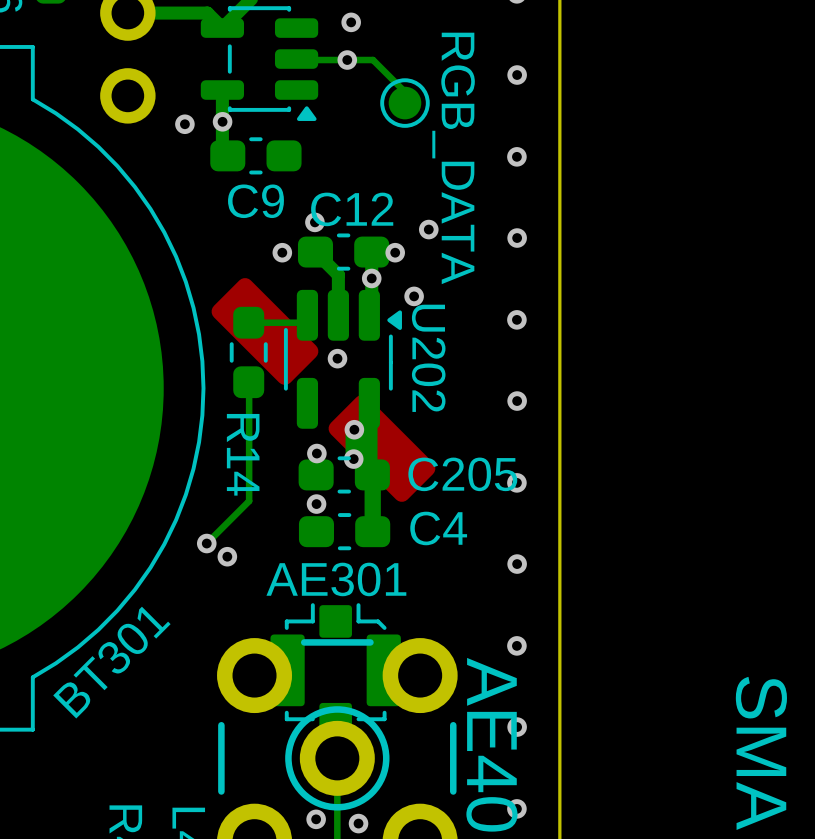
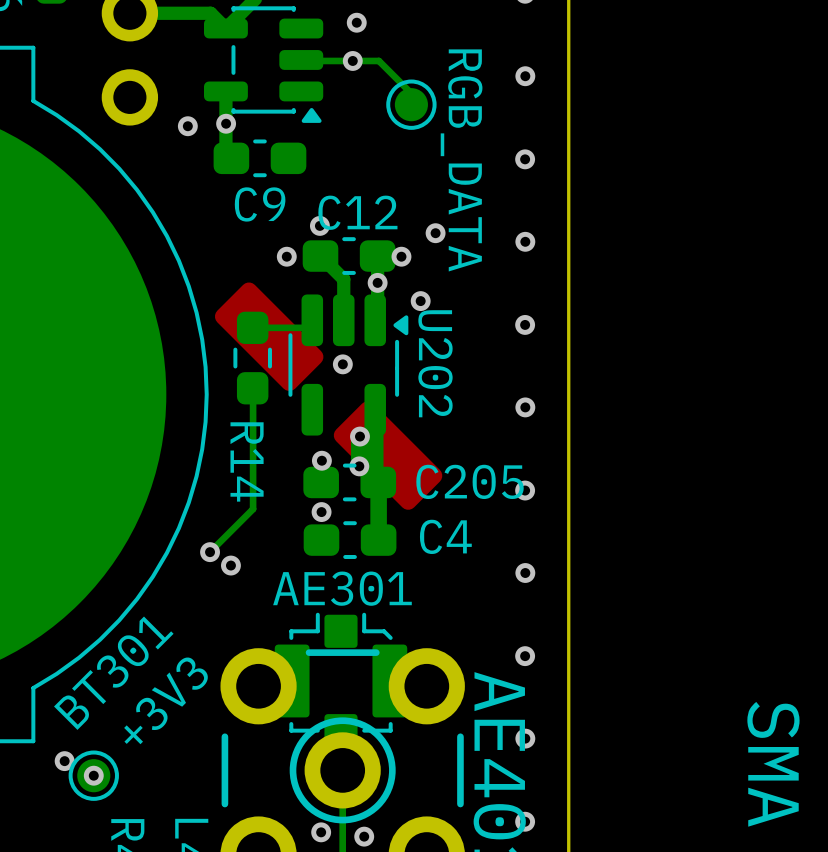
via: none -> (64, 761)
part: none -> +3V3 (93, 775)
via: none -> (93, 775)

